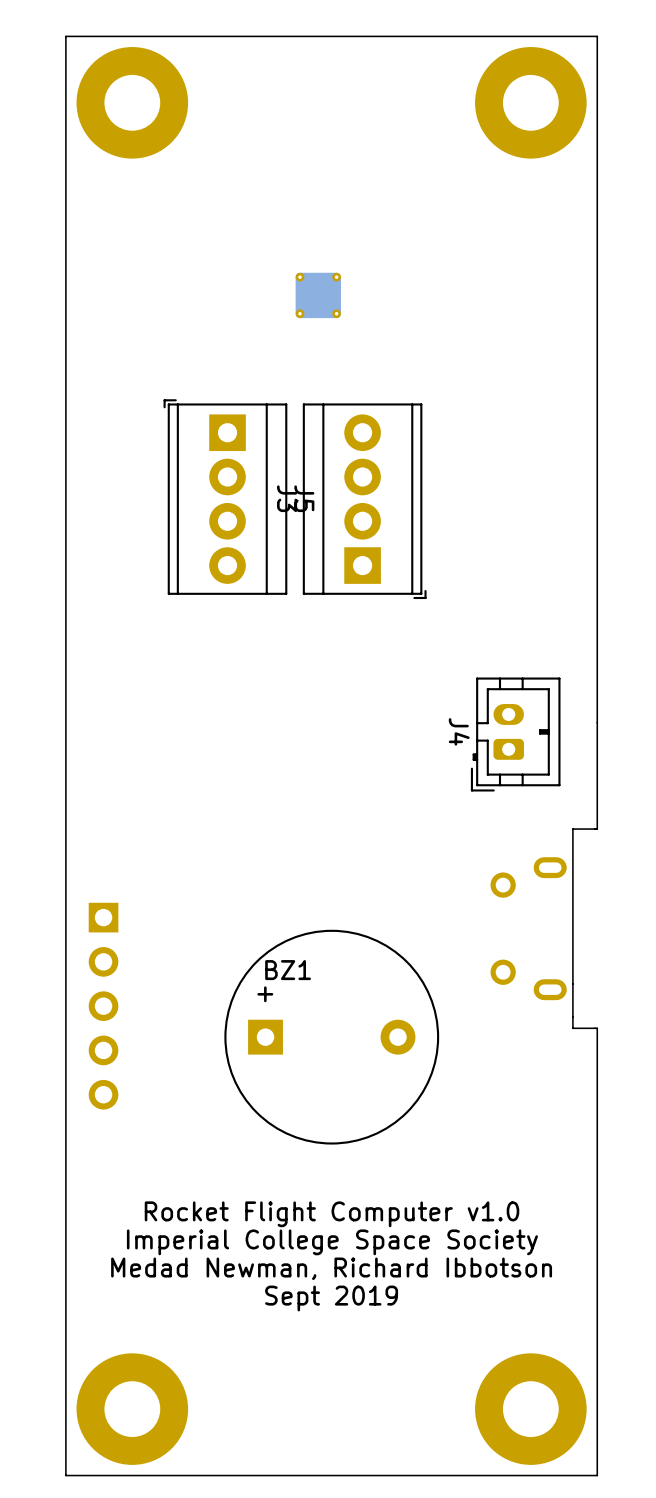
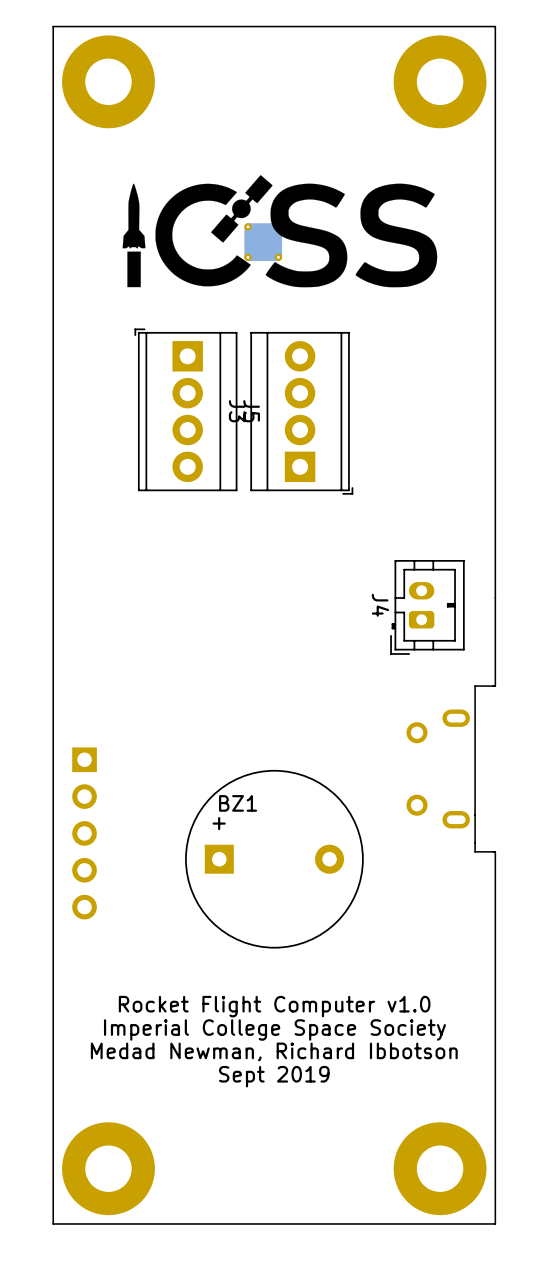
drawing: none -> [122, 175, 438, 288]

